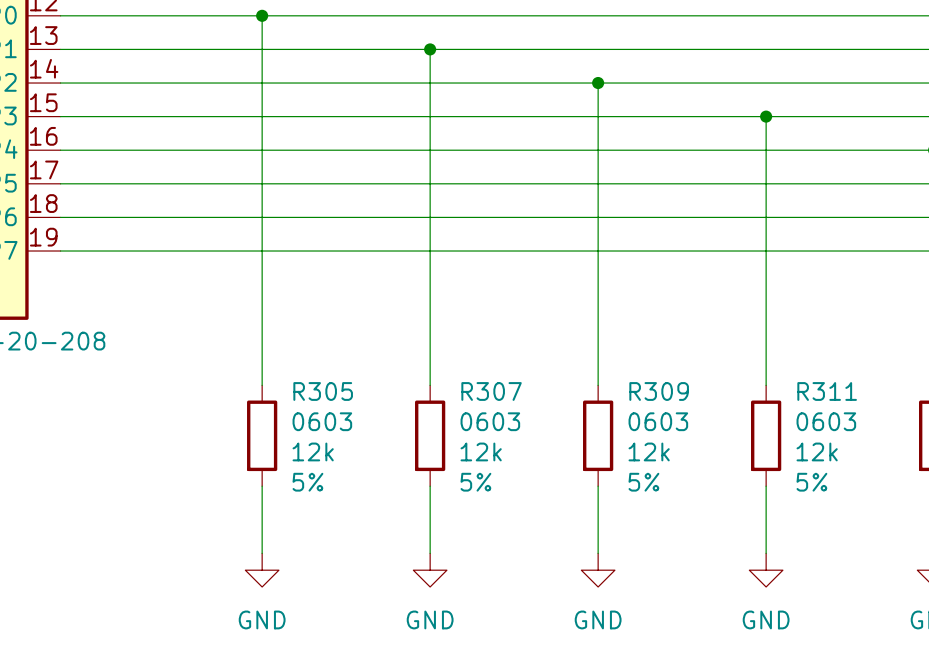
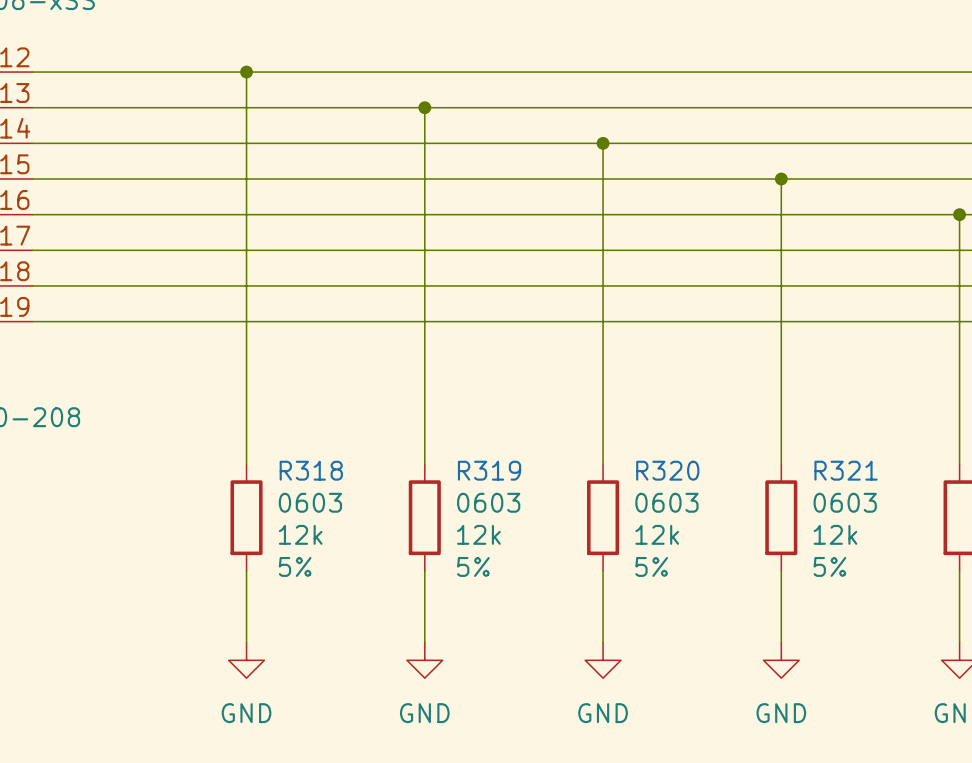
R305 name: R305 (323, 391) -> R318 (311, 470)
R307 name: R307 (491, 391) -> R319 (489, 470)
R309 name: R309 (659, 391) -> R320 (667, 470)
R311 name: R311 (827, 391) -> R321 (846, 470)

